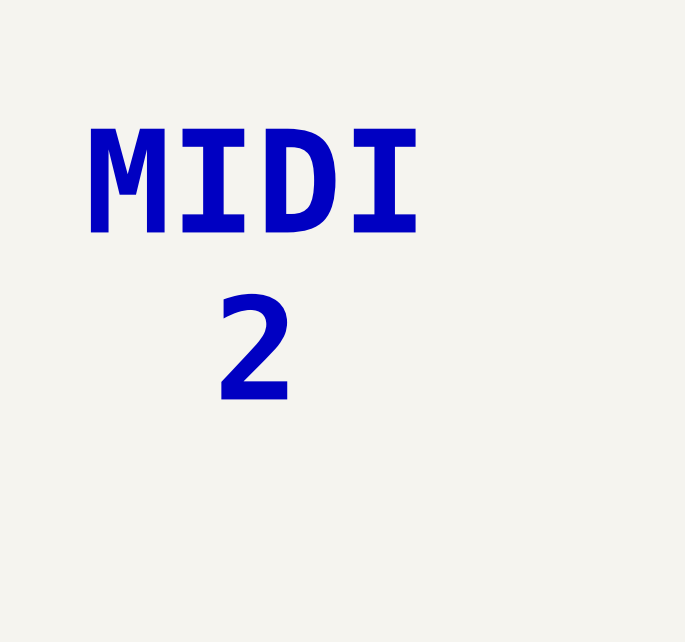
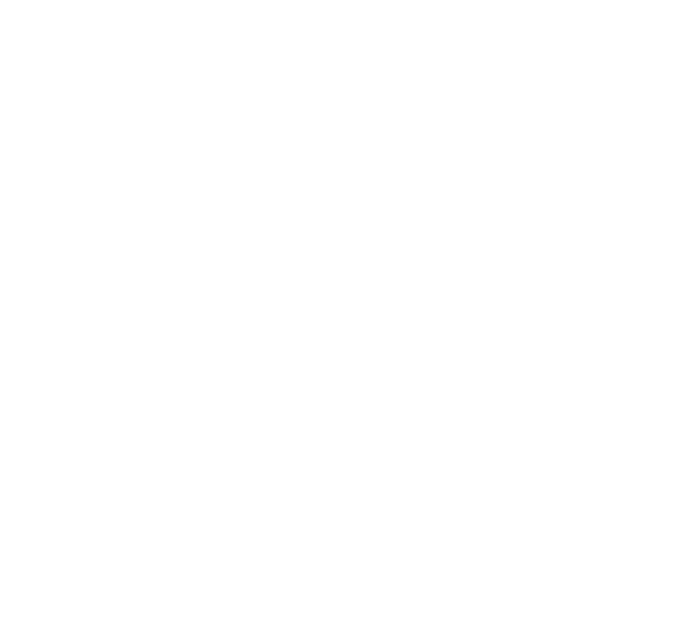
text: MIDI (253, 180) -> none
text: 2 (254, 346) -> none

